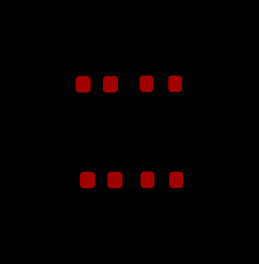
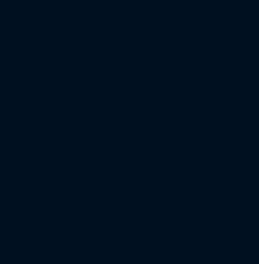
part: (160, 83) -> none
part: (96, 84) -> none
part: (101, 179) -> none
part: (161, 179) -> none

